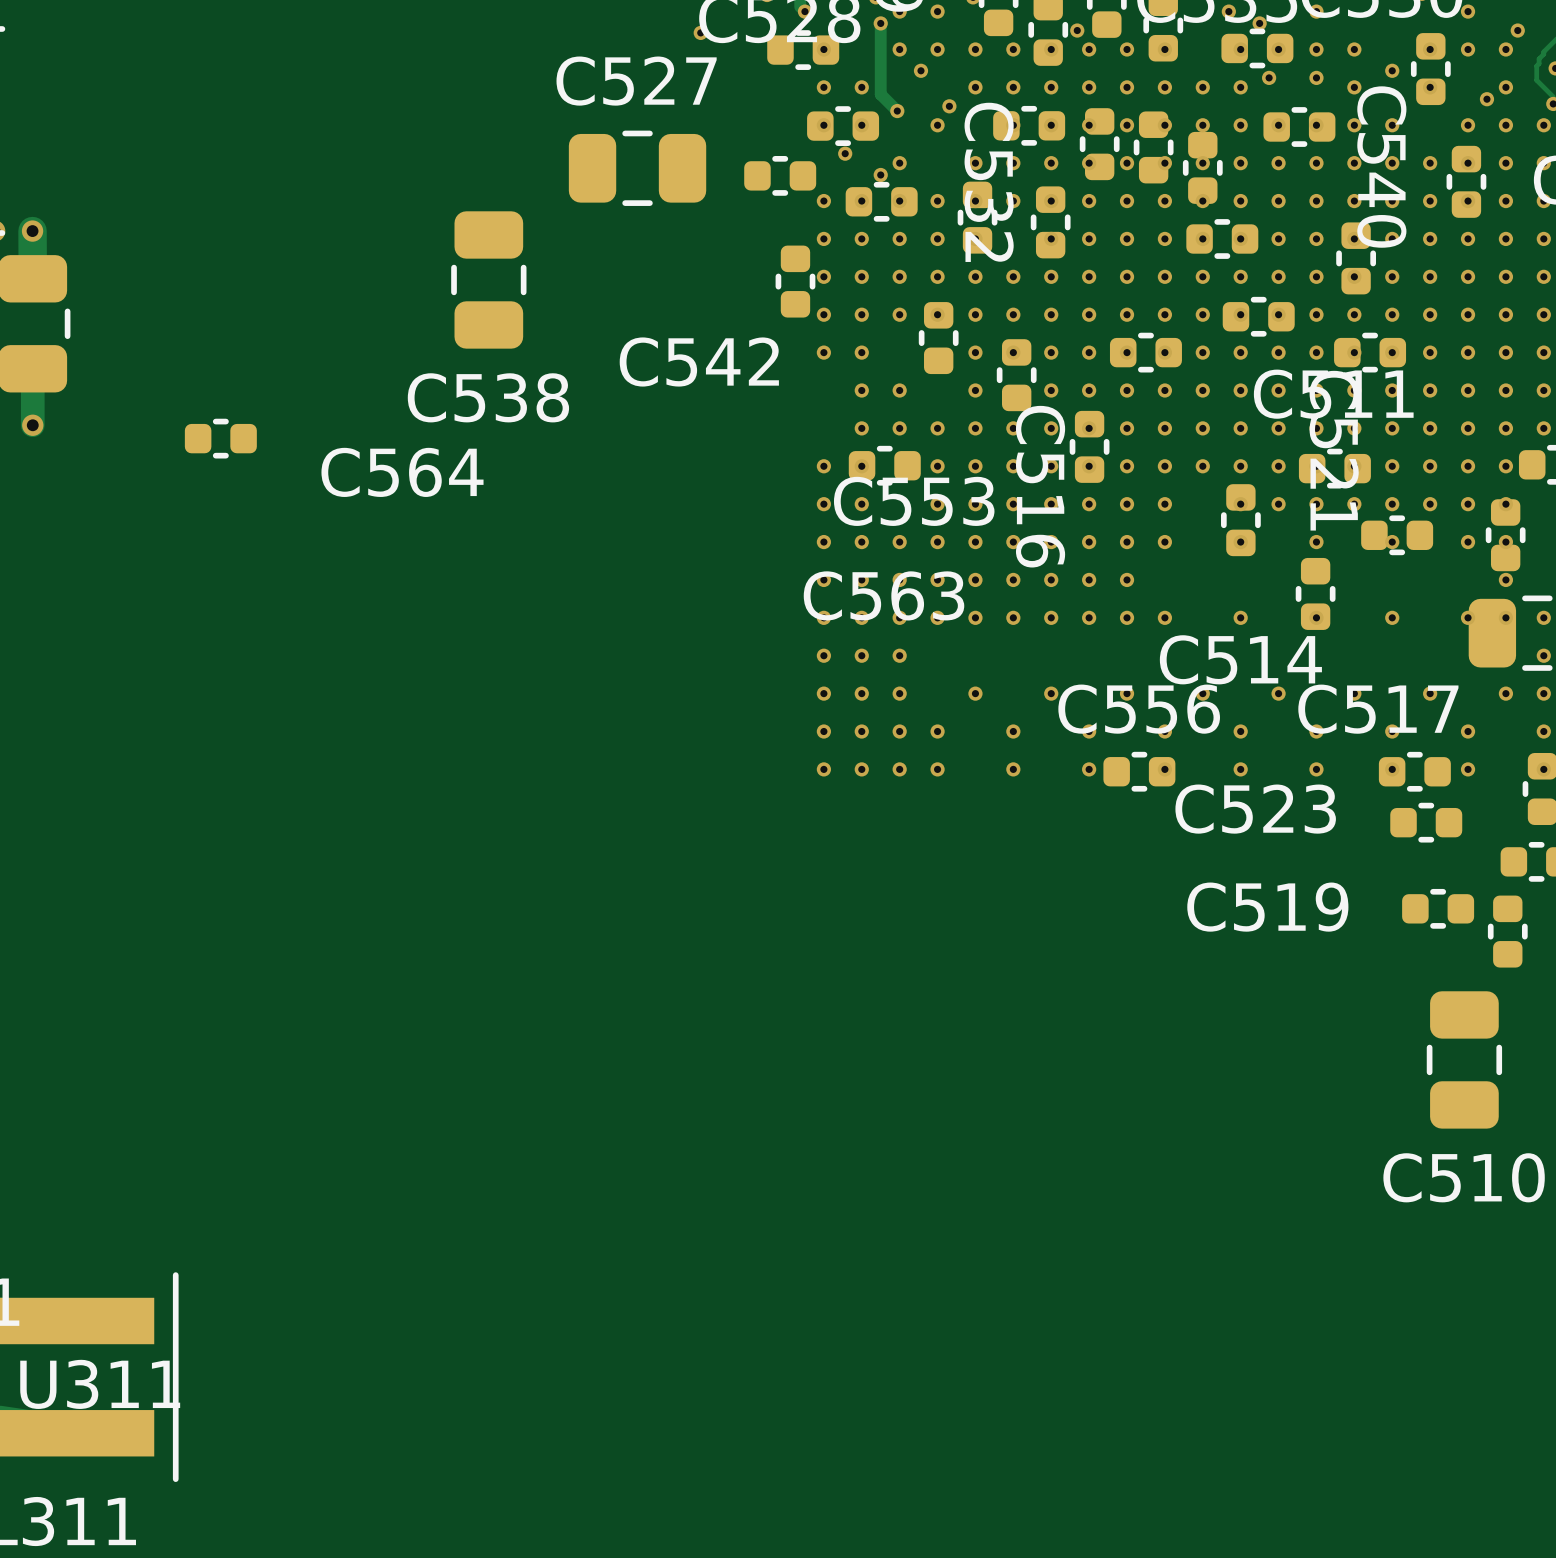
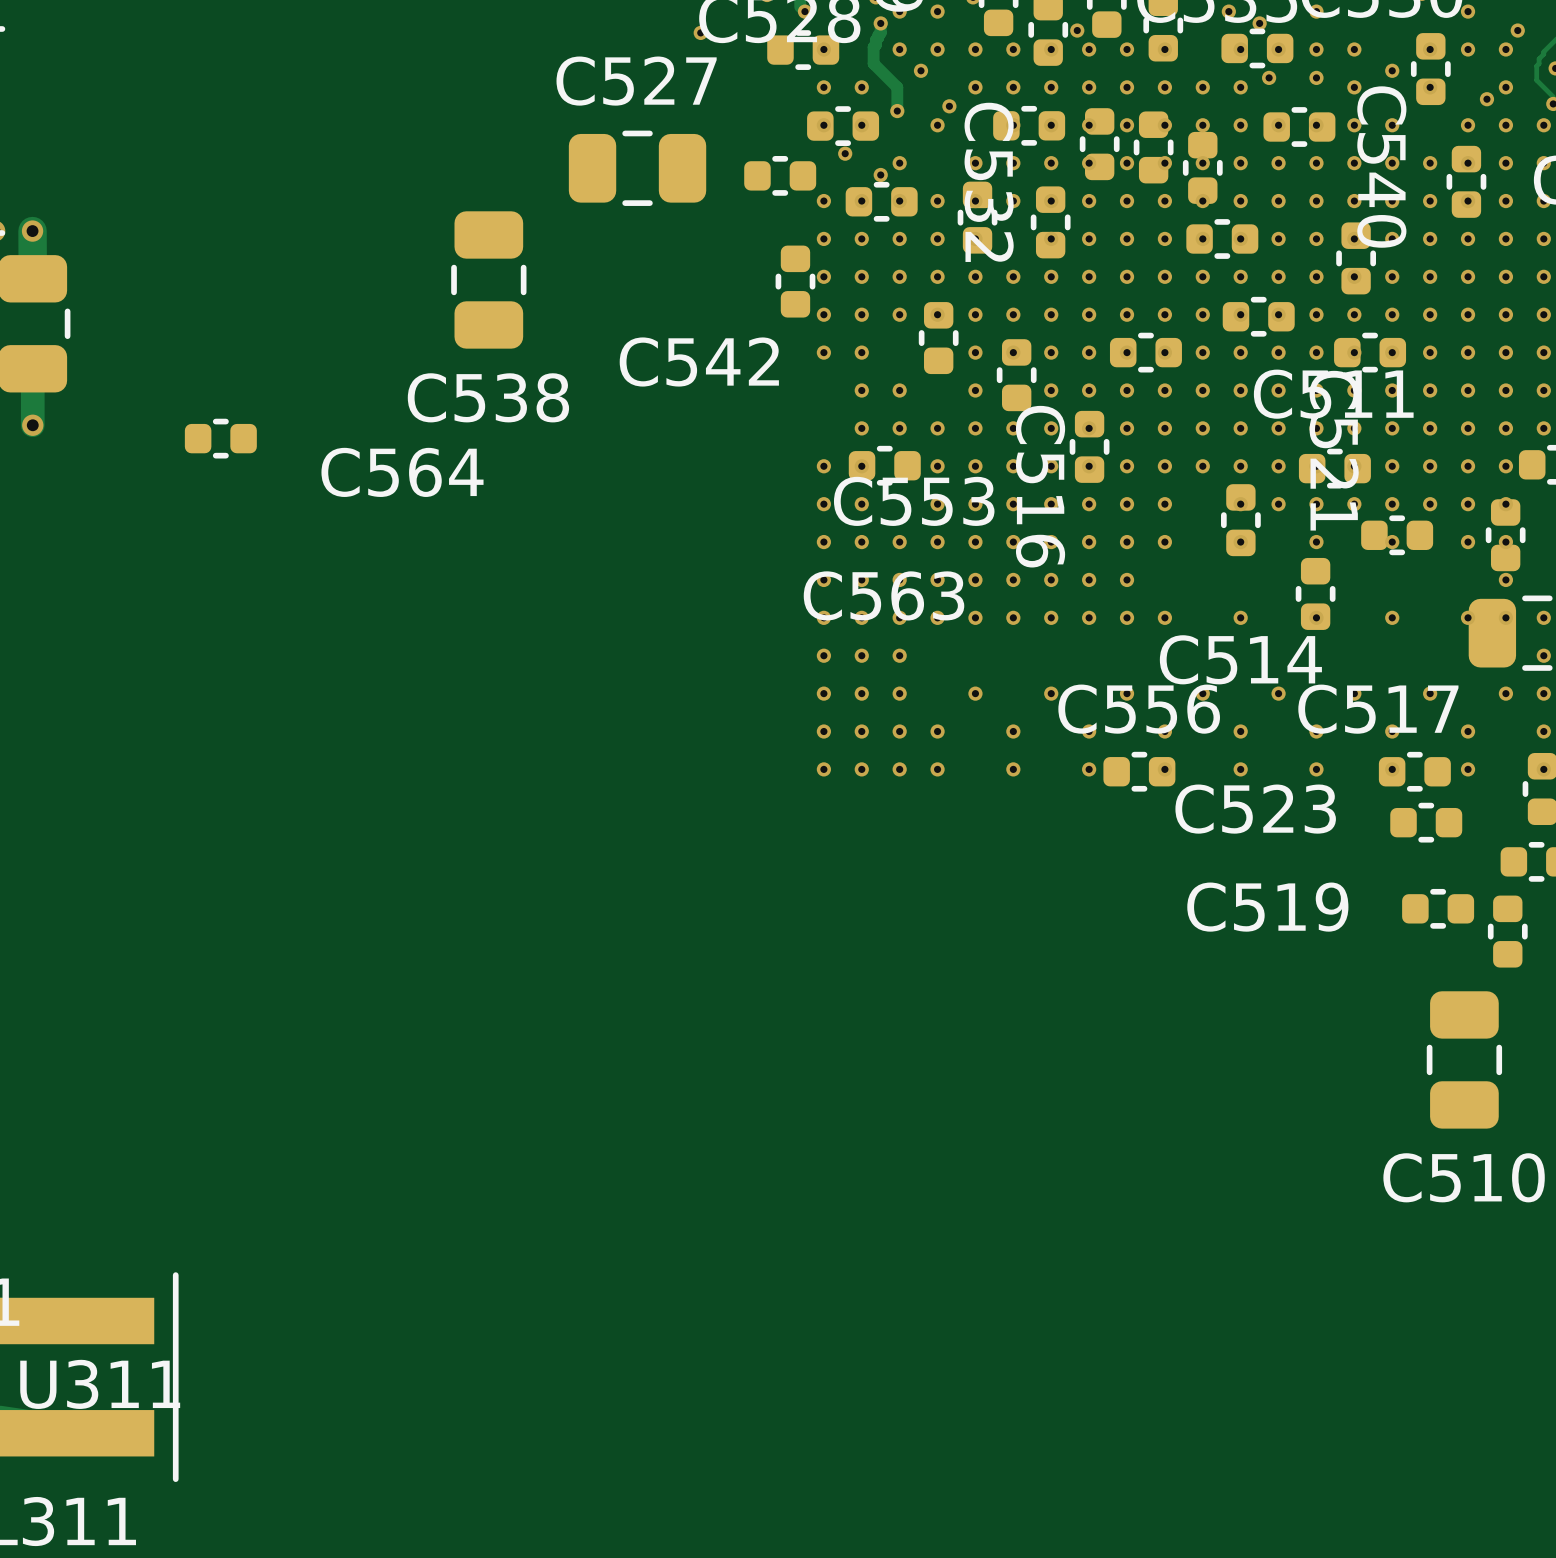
track: (880, 32) (880, 94) (897, 111) -> (880, 32) (873, 47) (873, 63) (897, 87) (897, 111)

